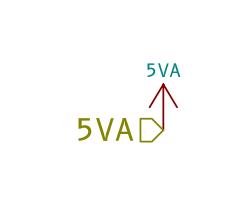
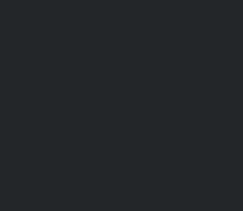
power symbol: 5VA (163, 107) -> none
hierarchical label: 5VA (105, 129) -> none

